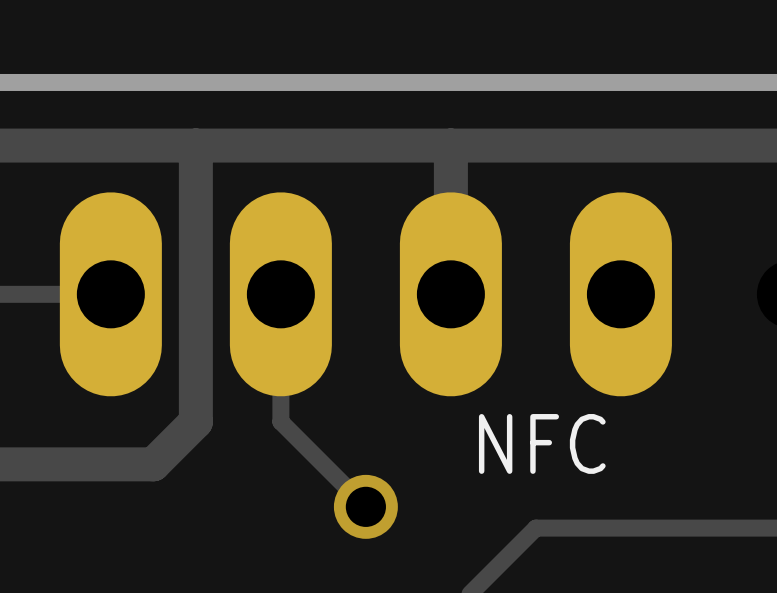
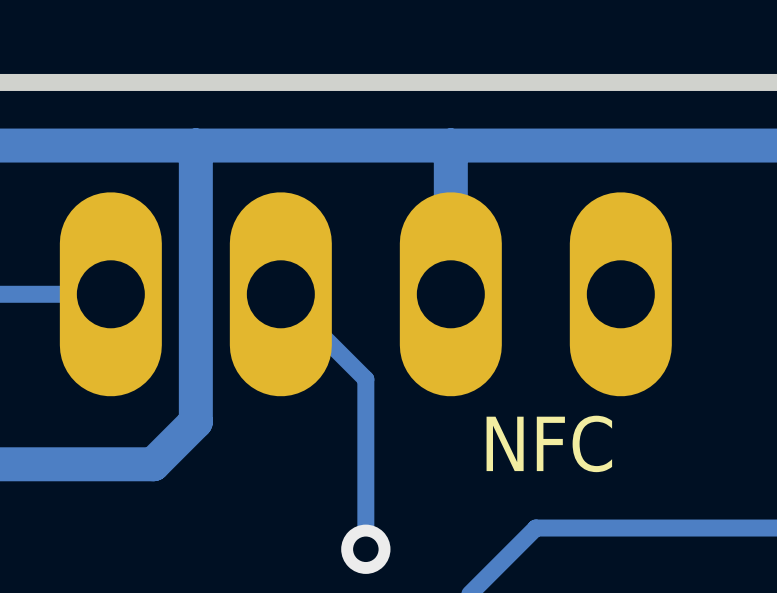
track: (280, 294) (280, 421) (365, 506) -> (280, 294) (365, 379) (365, 549)
via position: (365, 506) -> (365, 549)

